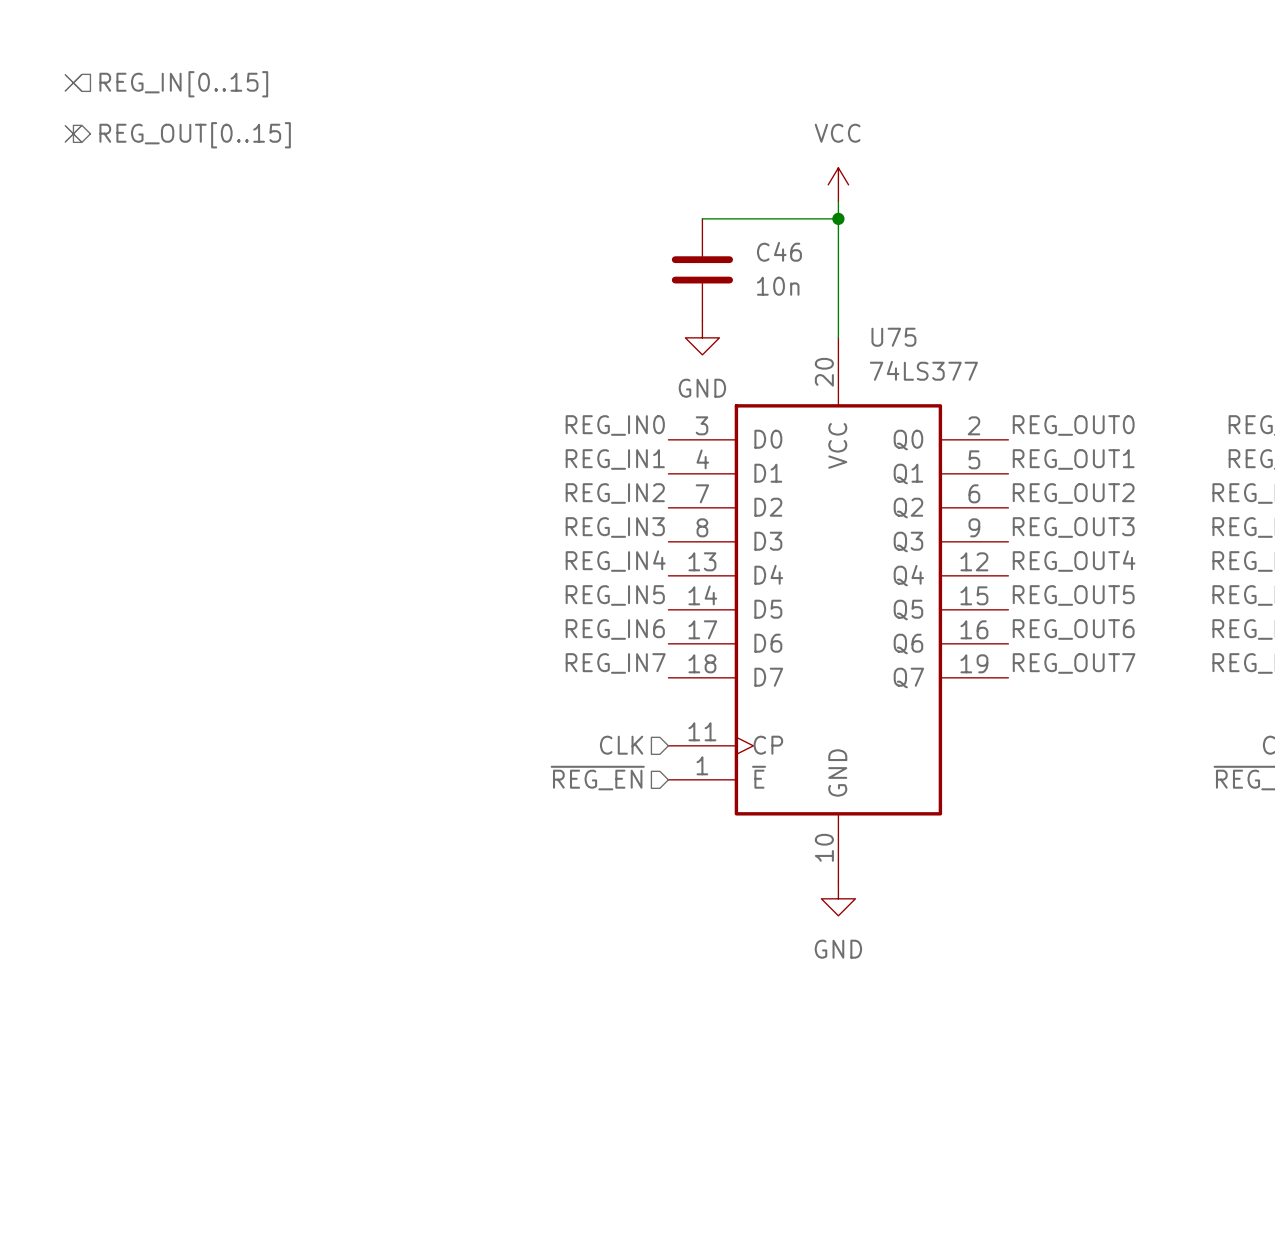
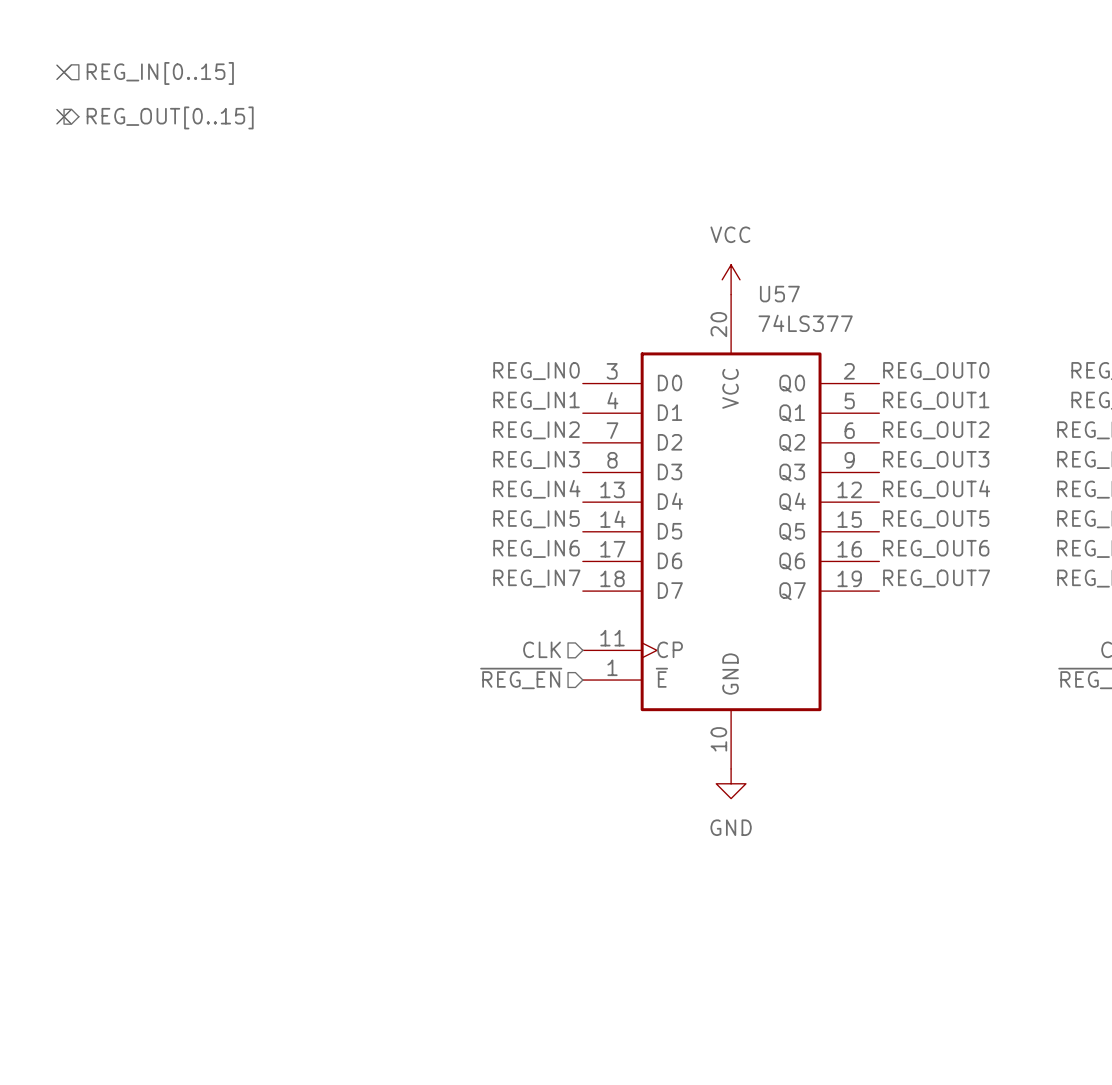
power symbol position: VCC (838, 184) -> VCC (731, 279)
wire: (838, 201) (838, 337) -> none
wire: (702, 218) (838, 218) -> none
junction: (838, 218) -> none
C46: 10n (702, 269) -> none
power symbol: GND (702, 337) -> none
U75 name: U75 (893, 337) -> U57 (779, 294)

